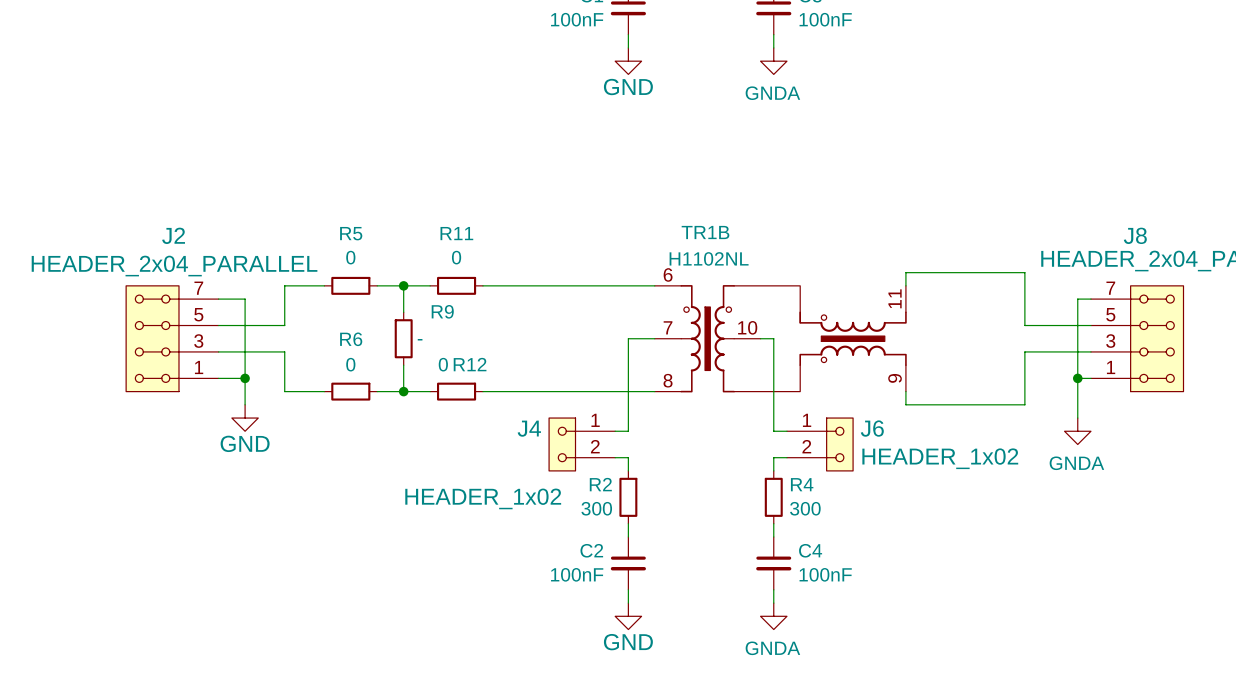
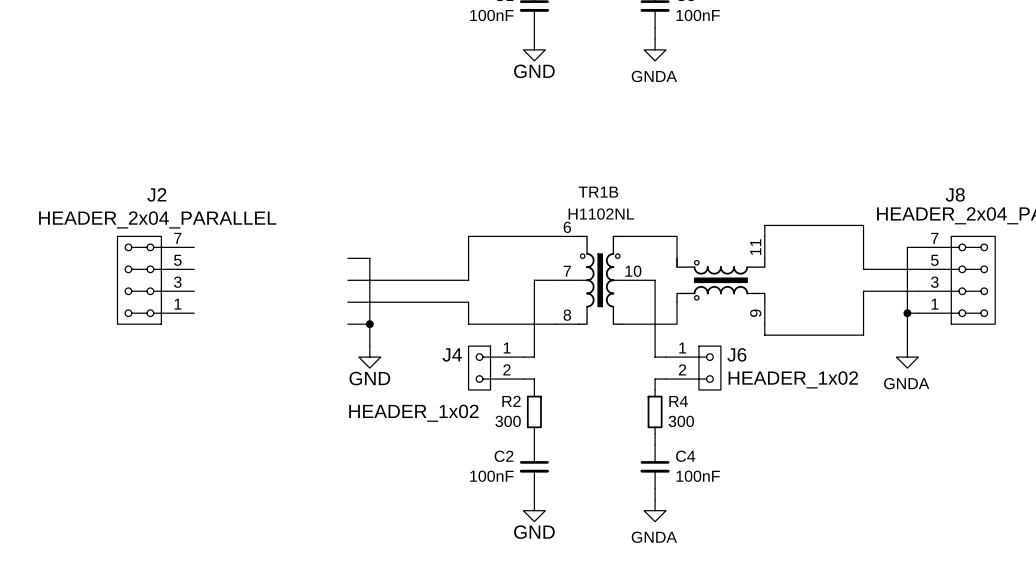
wire: (324, 285) (284, 285) (284, 325) (218, 325) -> none
R5: 0 (350, 285) -> none
wire: (377, 285) (430, 285) -> none
wire: (403, 285) (403, 312) -> (369, 346) (369, 258) (347, 258)
junction: (403, 285) -> none
R11: 0 (456, 285) -> none
wire: (482, 285) (549, 285) -> (347, 280) (468, 280) (468, 236)
wire: (218, 299) (245, 299) (245, 404) -> none
R9: - (403, 338) -> none
wire: (218, 351) (284, 351) (284, 391) (324, 391) -> none
wire: (403, 365) (403, 391) (377, 391) -> none
wire: (218, 378) (245, 378) -> none
junction: (245, 378) -> none
R6: 0 (350, 391) -> none
junction position: (403, 391) -> (369, 324)
R12: 0 (456, 391) -> none
wire: (482, 391) (549, 391) -> (347, 302) (468, 302) (468, 324)
power symbol position: GND (245, 418) -> GND (369, 357)

